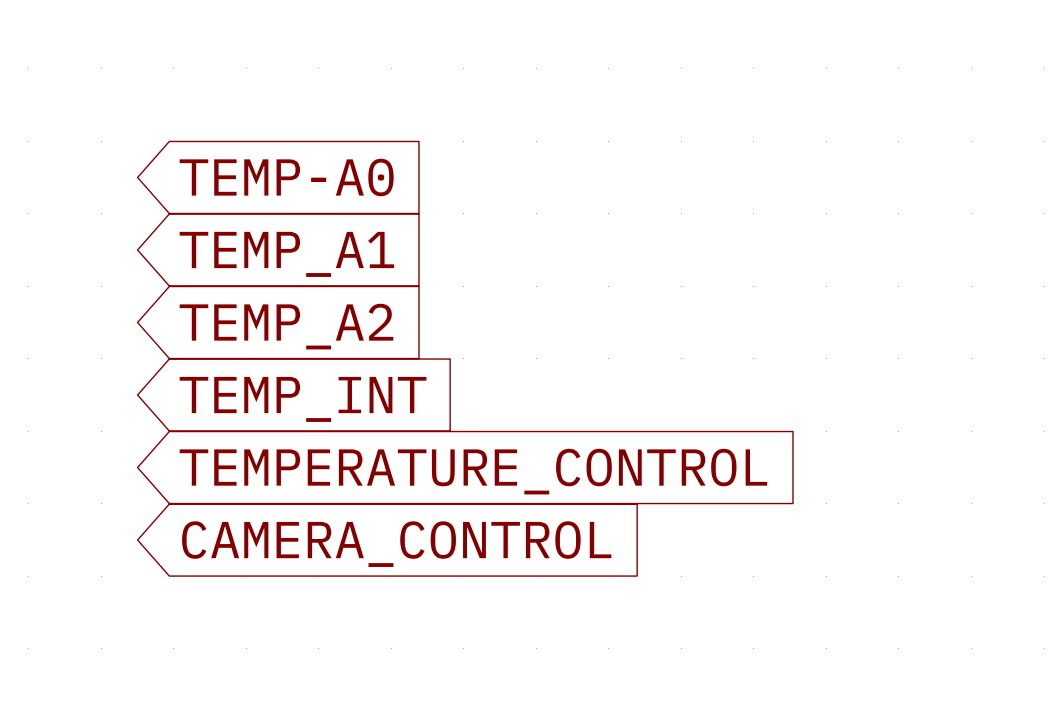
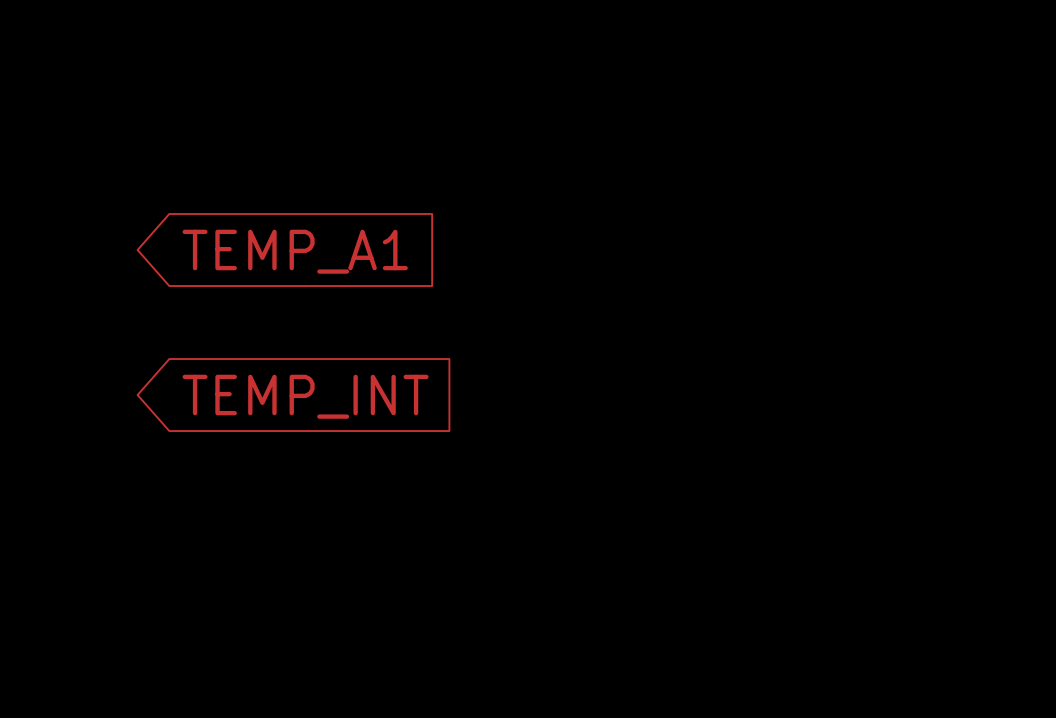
global label: TEMP-A0 (286, 177) -> none
global label: TEMP_A2 (286, 326) -> none
global label: TEMPERATURE_CONTROL (473, 471) -> none
global label: CAMERA_CONTROL (396, 544) -> none

